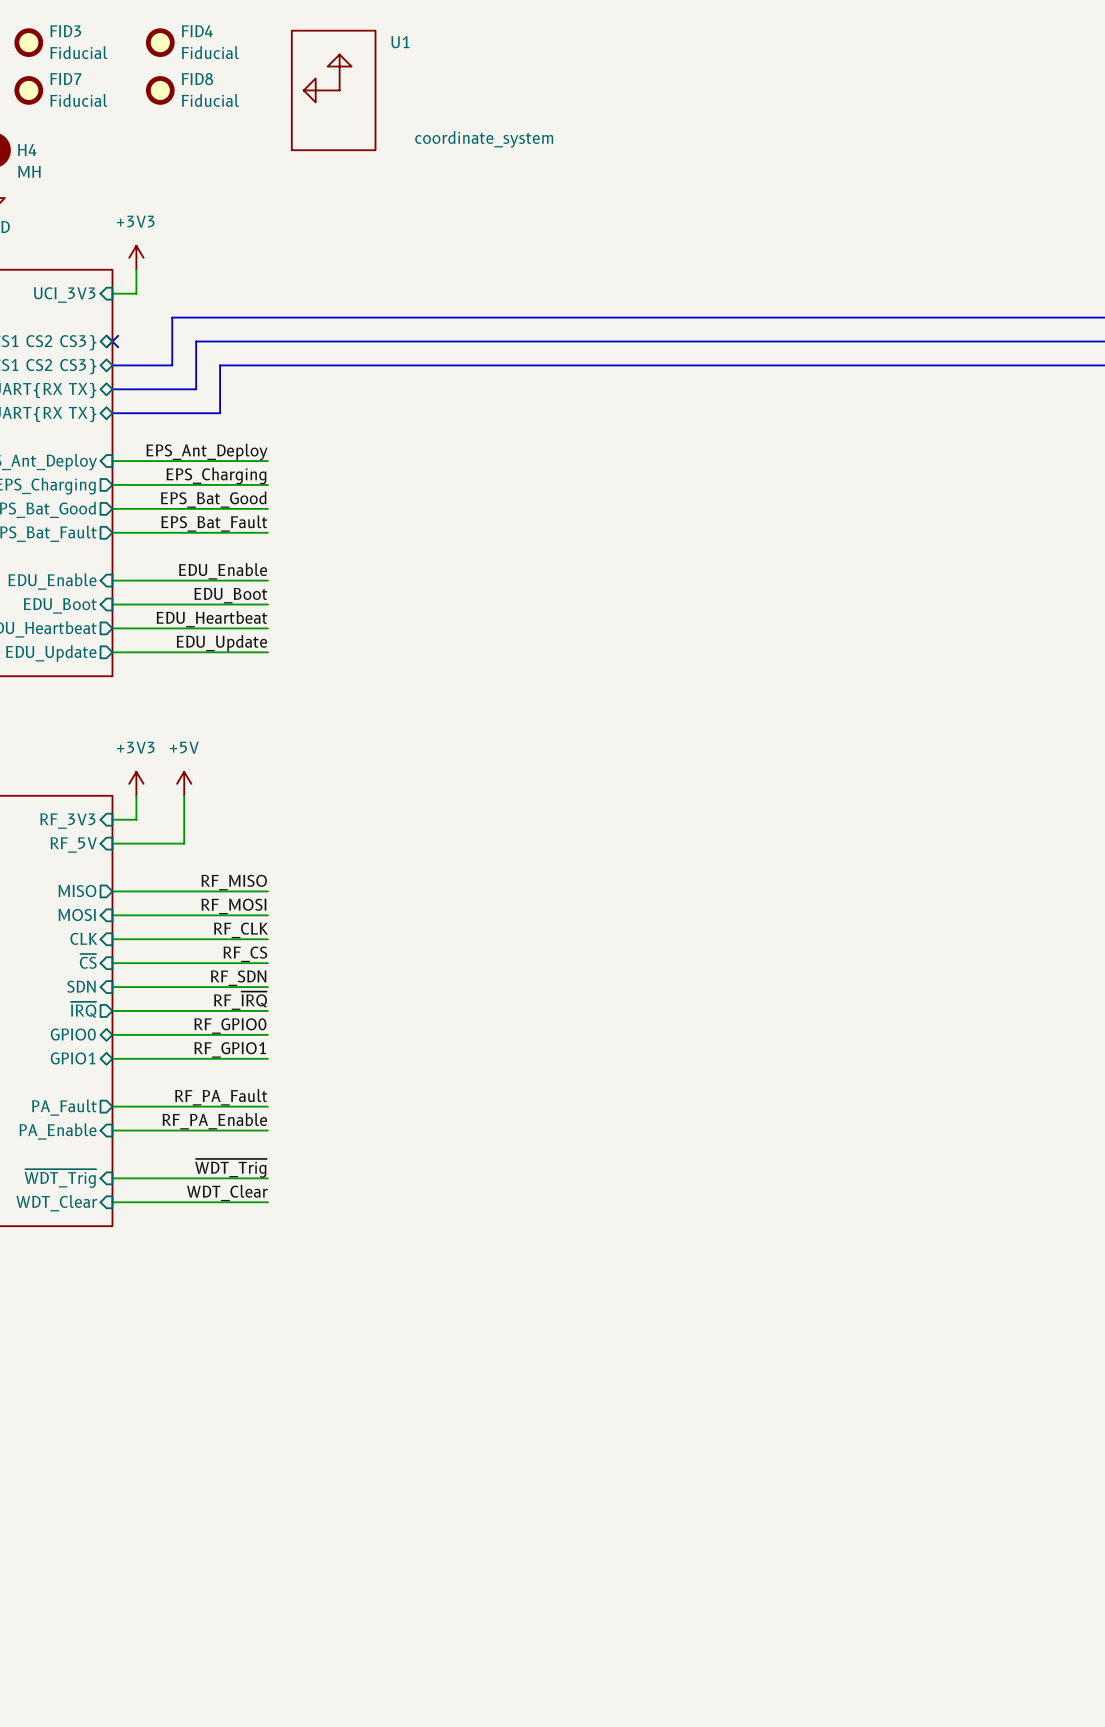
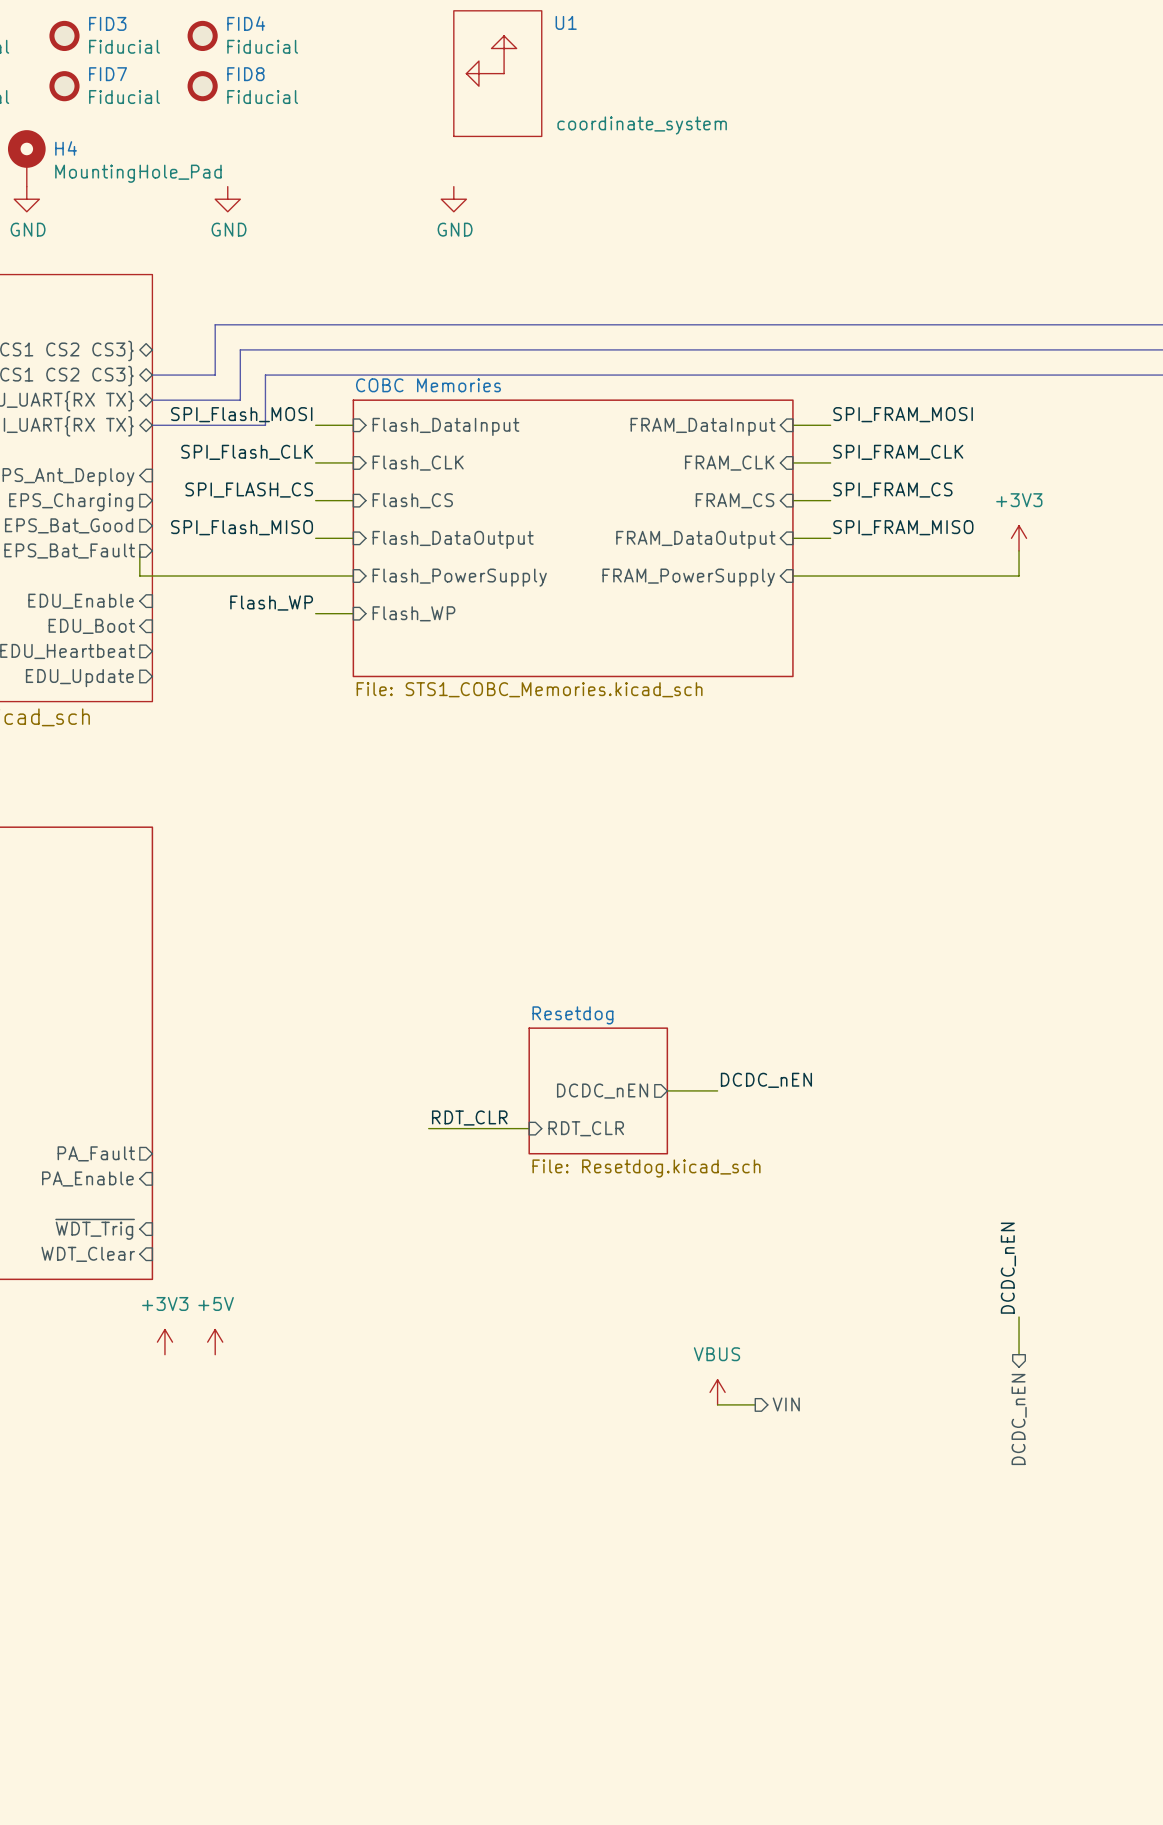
U1 position: (333, 90) -> (497, 73)
H4 value: MH (29, 171) -> MountingHole_Pad (138, 173)
power symbol: none -> GND (227, 199)
power symbol: none -> GND (453, 199)
power symbol: +3V3 (136, 257) -> none
wire: (136, 269) (136, 293) (112, 293) -> none
sheet pin: UCI_3V3 (64, 295) -> none
no-connect mark: (112, 341) -> none
label: none -> SPI_Flash_MOSI (241, 414)
label: none -> SPI_FRAM_MOSI (903, 414)
wire: none -> (315, 425) (353, 425)
wire: none -> (792, 425) (830, 425)
sheet pin: none -> Flash_DataInput (445, 426)
sheet pin: none -> FRAM_DataInput (703, 426)
label: none -> SPI_Flash_CLK (247, 452)
label: none -> SPI_FRAM_CLK (898, 452)
wire: none -> (315, 462) (353, 462)
wire: none -> (792, 462) (830, 462)
sheet pin: none -> Flash_CLK (418, 463)
sheet pin: none -> FRAM_CLK (729, 463)
label: EPS_Ant_Deploy (206, 451) -> none
wire: (112, 461) (267, 461) -> none
label: EPS_Charging (216, 475) -> SPI_FLASH_CS (249, 490)
label: none -> SPI_FRAM_CS (892, 490)
wire: (112, 484) (267, 484) -> (353, 500) (315, 500)
wire: none -> (792, 500) (830, 500)
sheet pin: none -> Flash_CS (412, 500)
sheet pin: none -> FRAM_CS (735, 500)
label: EPS_Bat_Good (213, 499) -> none
wire: (112, 508) (267, 508) -> none
label: none -> SPI_Flash_MISO (242, 527)
label: none -> SPI_FRAM_MISO (903, 527)
wire: none -> (315, 538) (353, 538)
sheet COBC Memories: none -> File: STS1_COBC_Memories.kicad_sch (573, 538)
wire: none -> (792, 538) (830, 538)
power symbol: none -> +3V3 (1019, 538)
sheet pin: none -> Flash_DataOutput (453, 539)
sheet pin: none -> FRAM_DataOutput (695, 539)
label: EPS_Bat_Fault (214, 523) -> none
wire: none -> (139, 550) (139, 576) (353, 576)
wire: (112, 532) (267, 532) -> none
wire: none -> (1019, 550) (1019, 576) (792, 576)
sheet pin: none -> Flash_PowerSupply (459, 577)
sheet pin: none -> FRAM_PowerSupply (688, 577)
label: EDU_Enable (223, 571) -> none
wire: (112, 580) (267, 580) -> none
label: none -> Flash_WP (271, 603)
wire: none -> (315, 613) (353, 613)
sheet pin: none -> Flash_WP (413, 613)
label: EDU_Boot (230, 595) -> none
wire: (112, 604) (267, 604) -> none
label: EDU_Heartbeat (212, 619) -> none
wire: (112, 628) (267, 628) -> none
label: EDU_Update (221, 643) -> none
wire: (112, 652) (267, 652) -> none
power symbol: +3V3 (136, 783) -> none
power symbol: +5V (184, 783) -> none
wire: (136, 795) (136, 819) (112, 819) -> none
wire: (184, 795) (184, 843) (112, 843) -> none
sheet pin: RF_3V3 (67, 821) -> none
sheet pin: RF_5V (73, 844) -> none
label: RF_MISO (234, 882) -> none
sheet pin: MISO (77, 891) -> none
wire: (112, 891) (267, 891) -> none
label: RF_MOSI (233, 906) -> none
sheet pin: MOSI (77, 914) -> none
wire: (112, 915) (267, 915) -> none
label: RF_CLK (240, 930) -> none
sheet pin: CLK (83, 938) -> none
wire: (112, 939) (267, 939) -> none
label: RF_CS (245, 954) -> none
sheet pin: ~{CS} (88, 961) -> none
wire: (112, 963) (267, 963) -> none
label: RF_SDN (238, 978) -> none
sheet pin: SDN (81, 986) -> none
wire: (112, 987) (267, 987) -> none
label: RF_~{IRQ} (240, 1000) -> none
sheet pin: ~{IRQ} (83, 1009) -> none
wire: (112, 1010) (267, 1010) -> none
label: RF_GPIO0 (230, 1026) -> none
sheet pin: GPIO0 (73, 1034) -> none
wire: (112, 1034) (267, 1034) -> none
label: none -> DCDC_nEN (766, 1080)
sheet Resetdog: none -> File: Resetdog.kicad_sch (598, 1090)
wire: none -> (667, 1090) (717, 1090)
sheet pin: none -> DCDC_nEN (602, 1091)
label: RF_GPIO1 (230, 1049) -> none
sheet pin: GPIO1 (73, 1058) -> none
wire: (112, 1058) (267, 1058) -> none
label: none -> RDT_CLR (469, 1118)
wire: none -> (428, 1128) (529, 1128)
sheet pin: none -> RDT_CLR (586, 1128)
label: RF_PA_Fault (221, 1097) -> none
wire: (112, 1106) (267, 1106) -> none
label: RF_PA_Enable (214, 1121) -> none
wire: (112, 1130) (267, 1130) -> none
label: ~{WDT_Trig} (230, 1168) -> none
wire: (112, 1178) (267, 1178) -> none
label: WDT_Clear (227, 1192) -> none
wire: (112, 1202) (267, 1202) -> none
label: none -> DCDC_nEN (1008, 1268)
wire: none -> (1019, 1317) (1019, 1354)
power symbol: none -> +3V3 (164, 1342)
power symbol: none -> +5V (215, 1342)
power symbol: none -> VBUS (717, 1392)
wire: none -> (717, 1404) (755, 1404)
sheet pin: none -> VIN (786, 1404)
sheet pin: none -> DCDC_nEN (1019, 1419)

